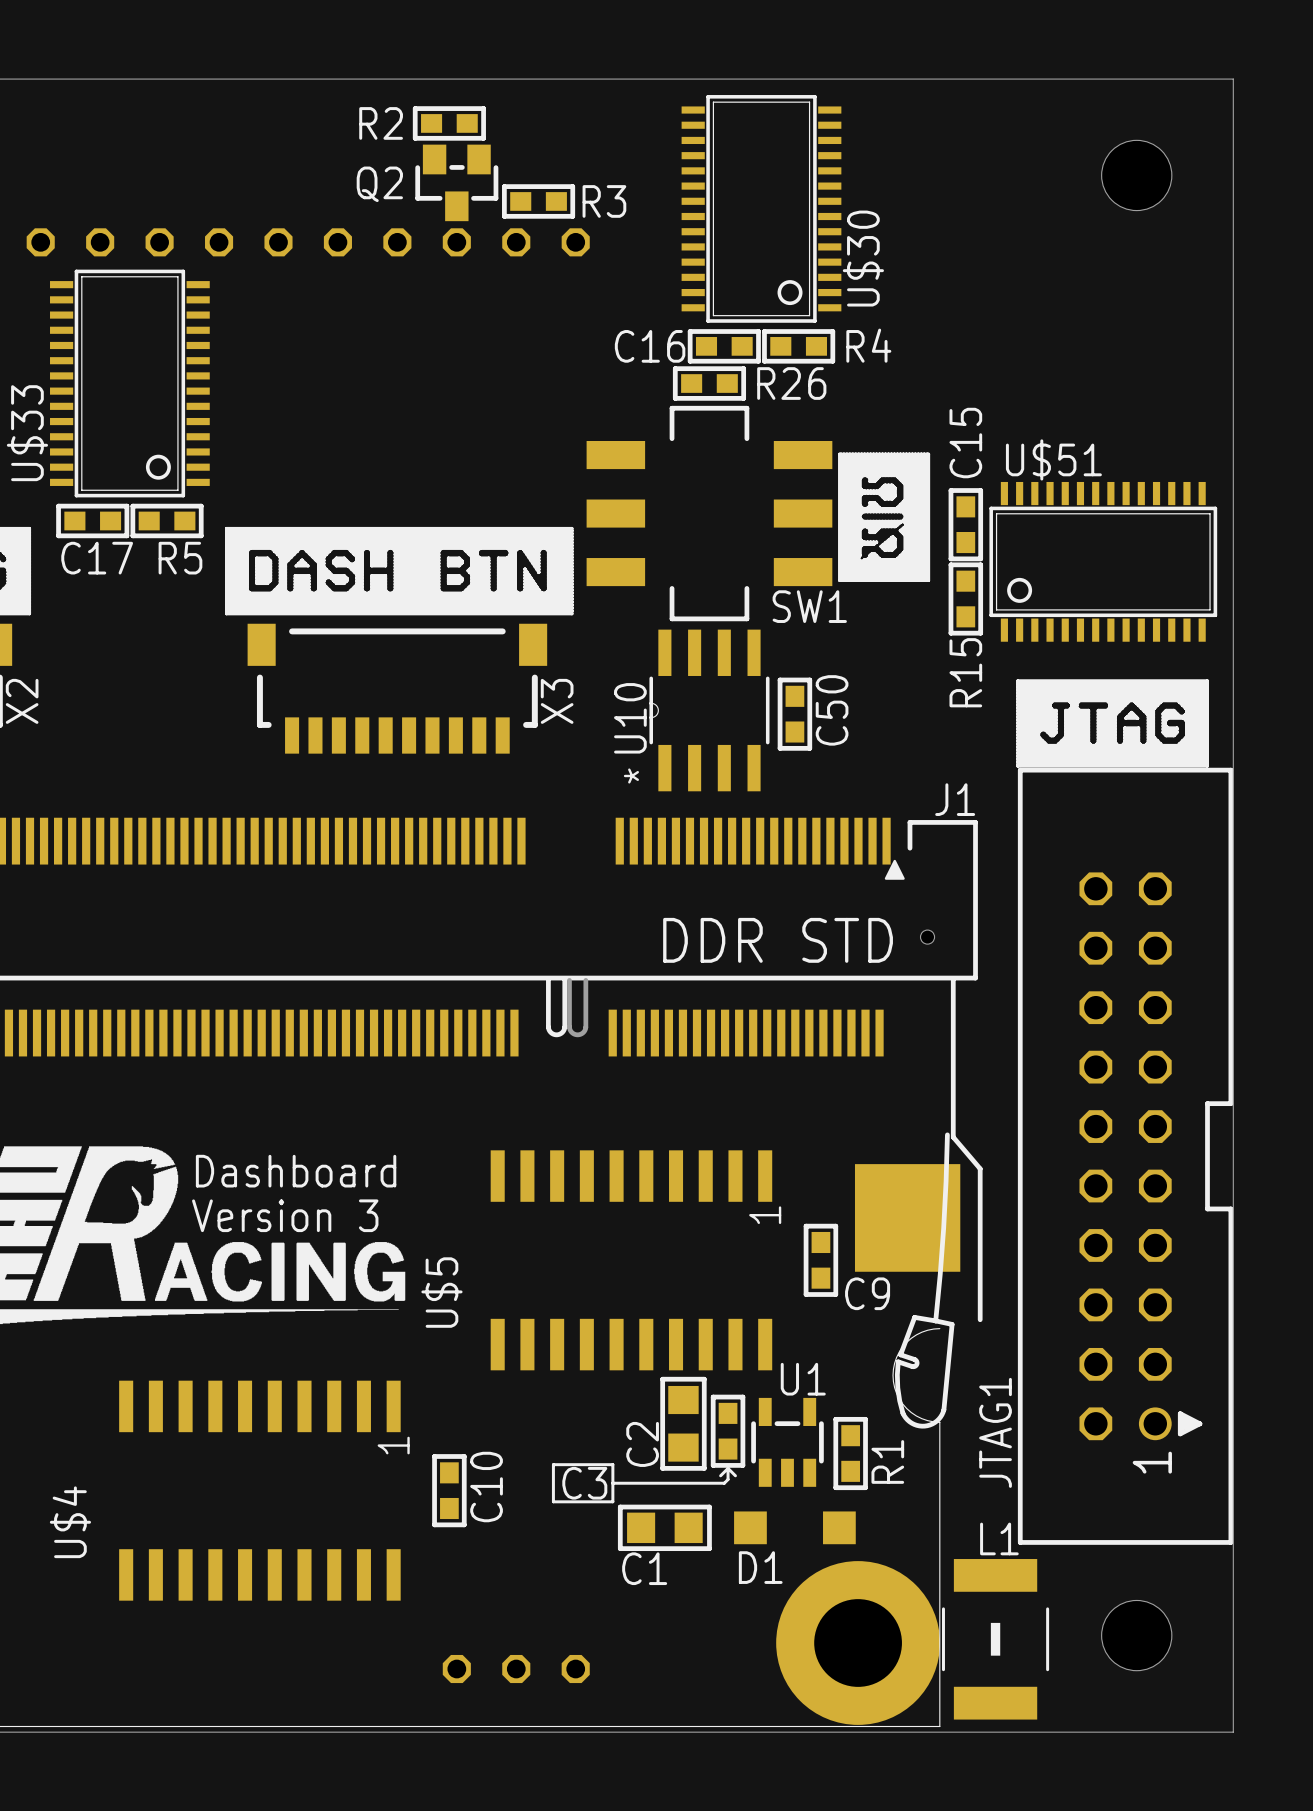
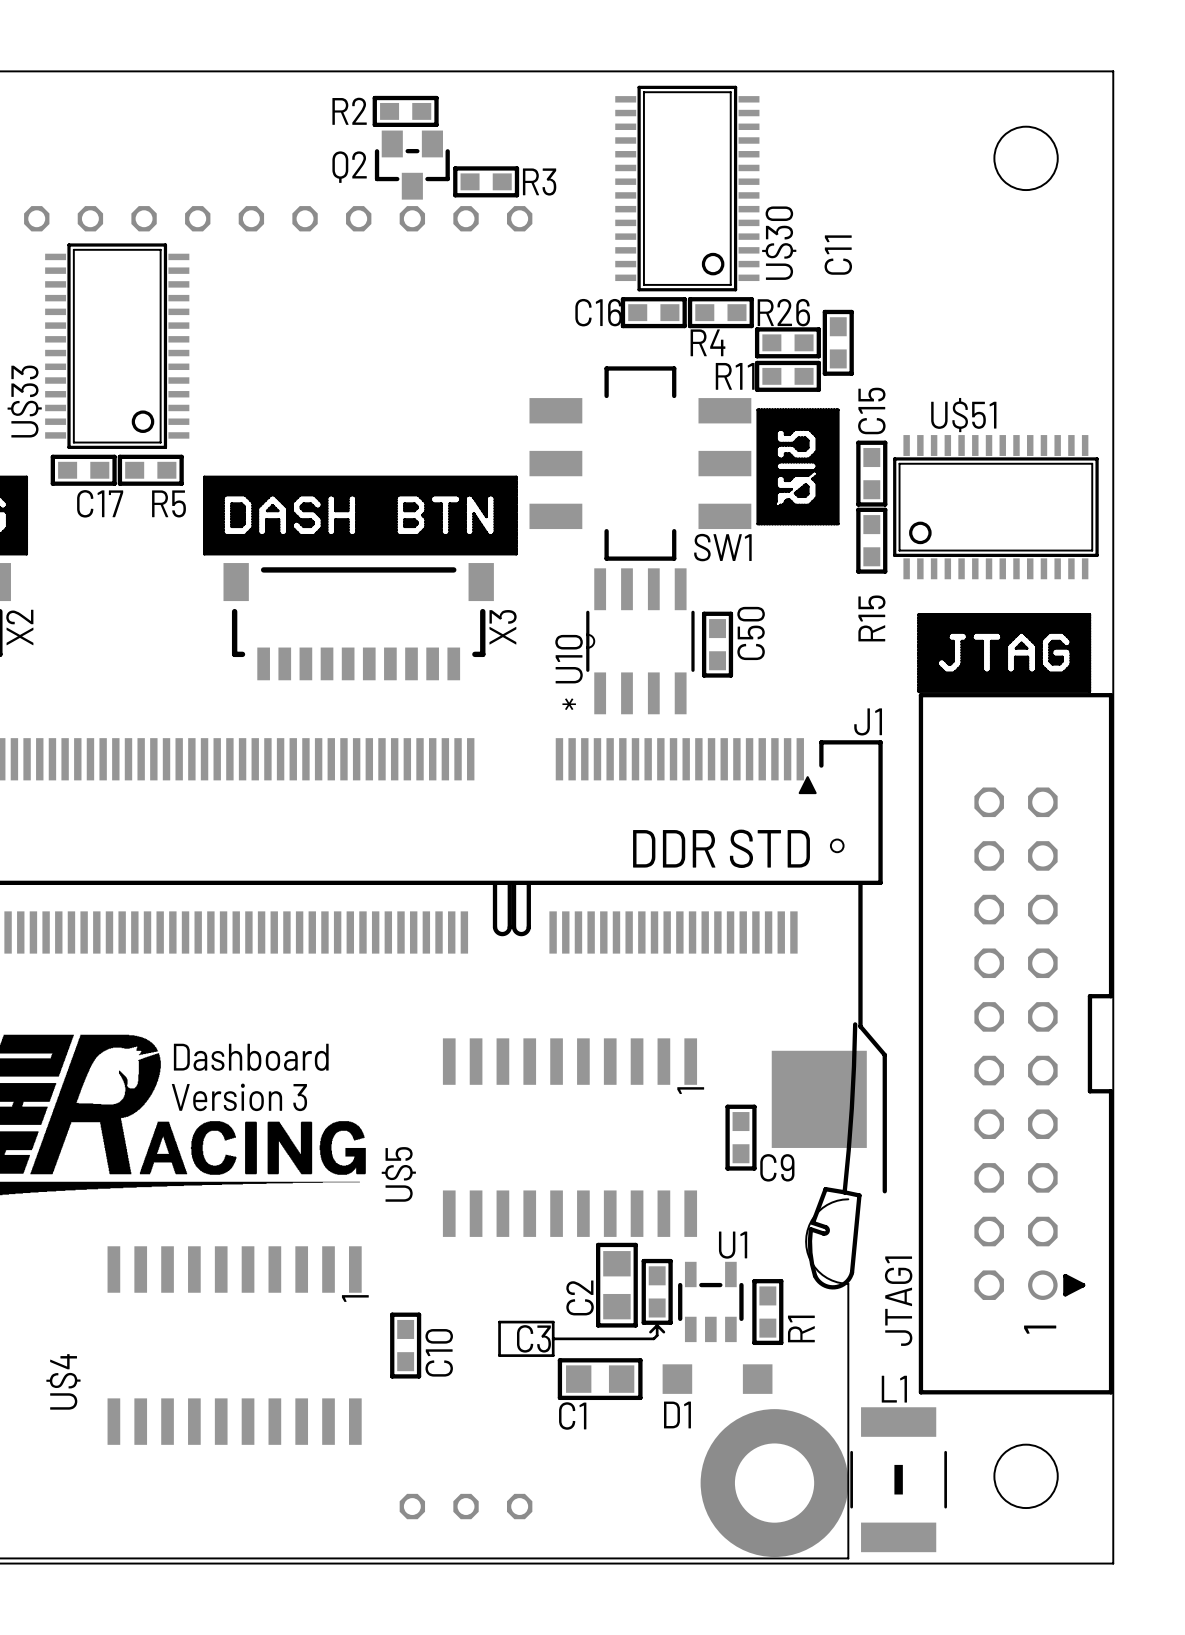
R4 name position: R4 (868, 345) -> R4 (707, 342)
C11: none -> (838, 342)
R26 position: (709, 383) -> (787, 342)
R26 name position: R26 (791, 383) -> R26 (783, 312)
R11: none -> (787, 376)

